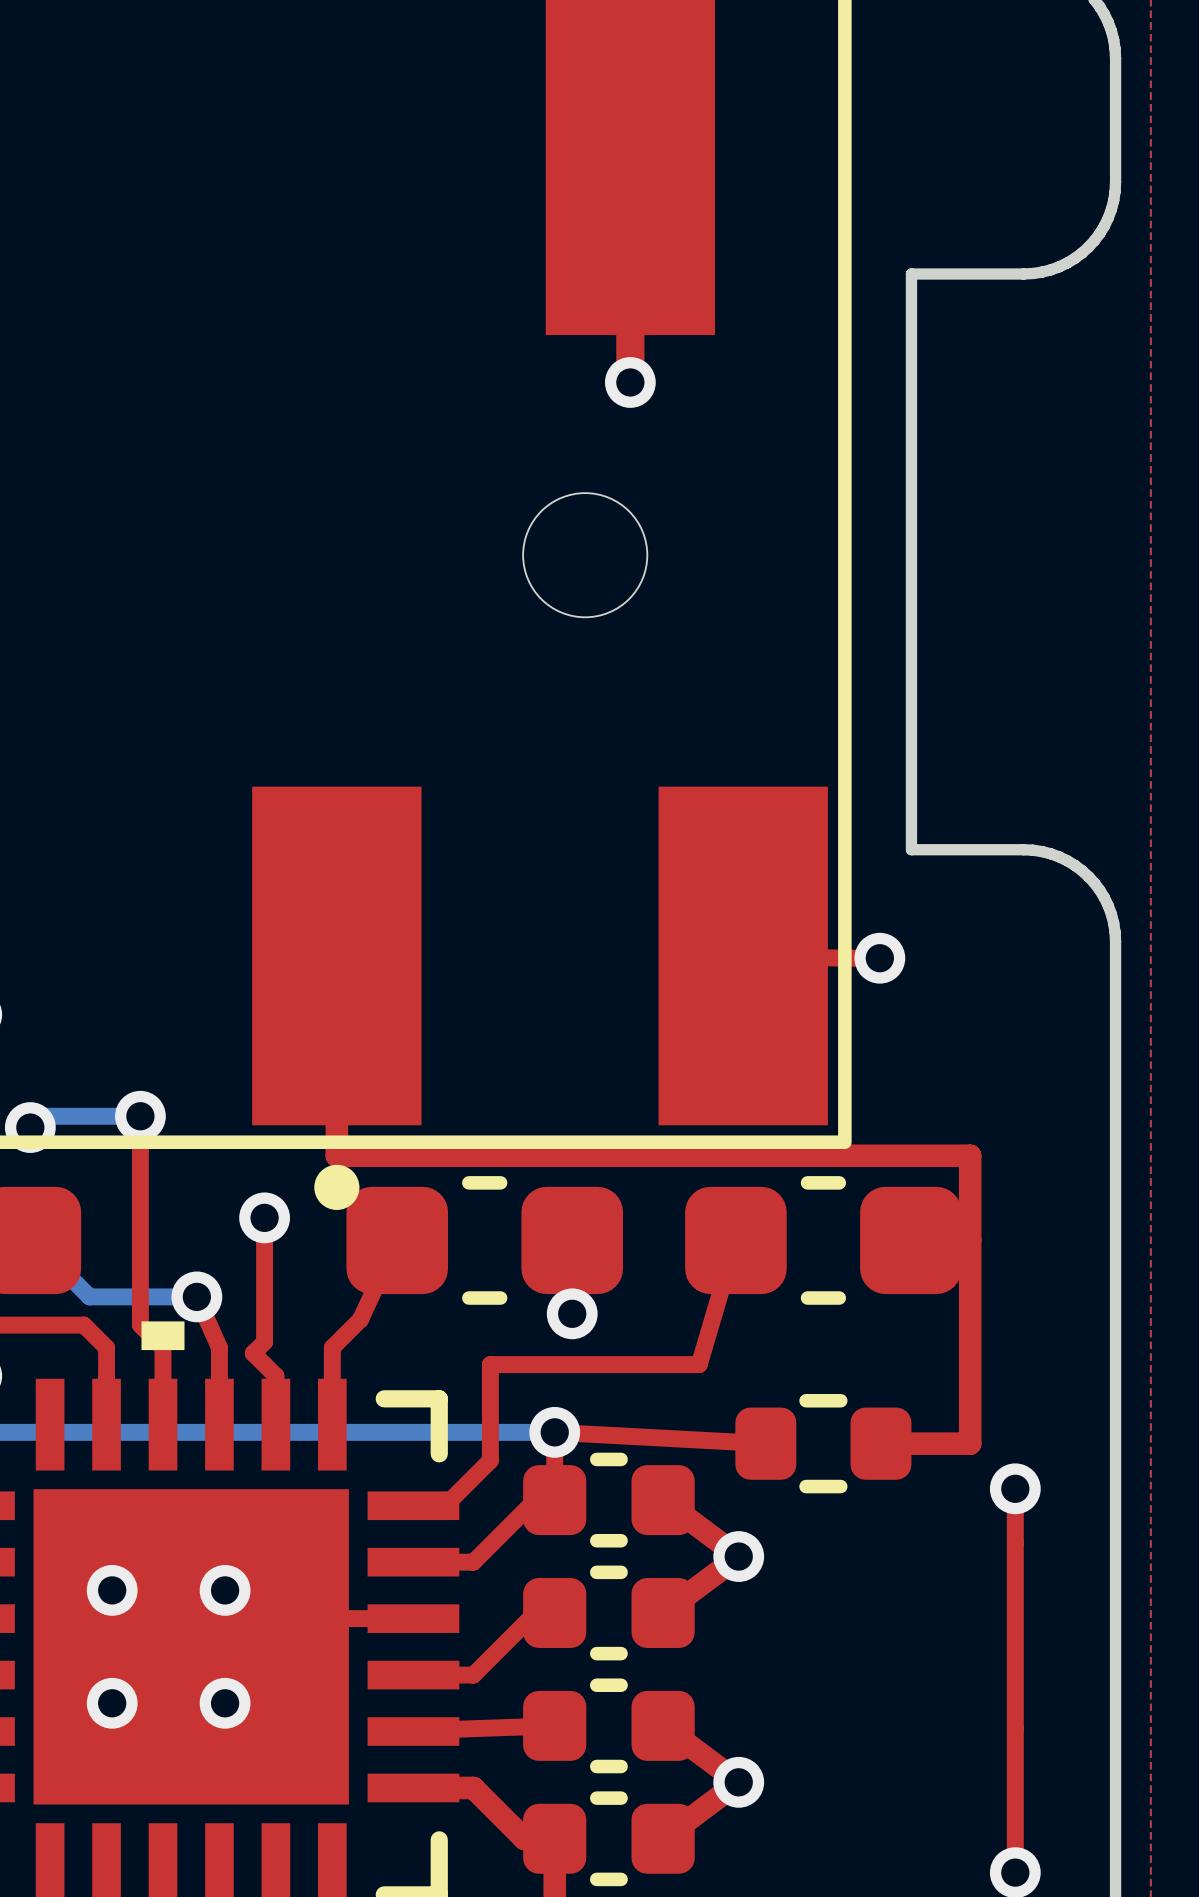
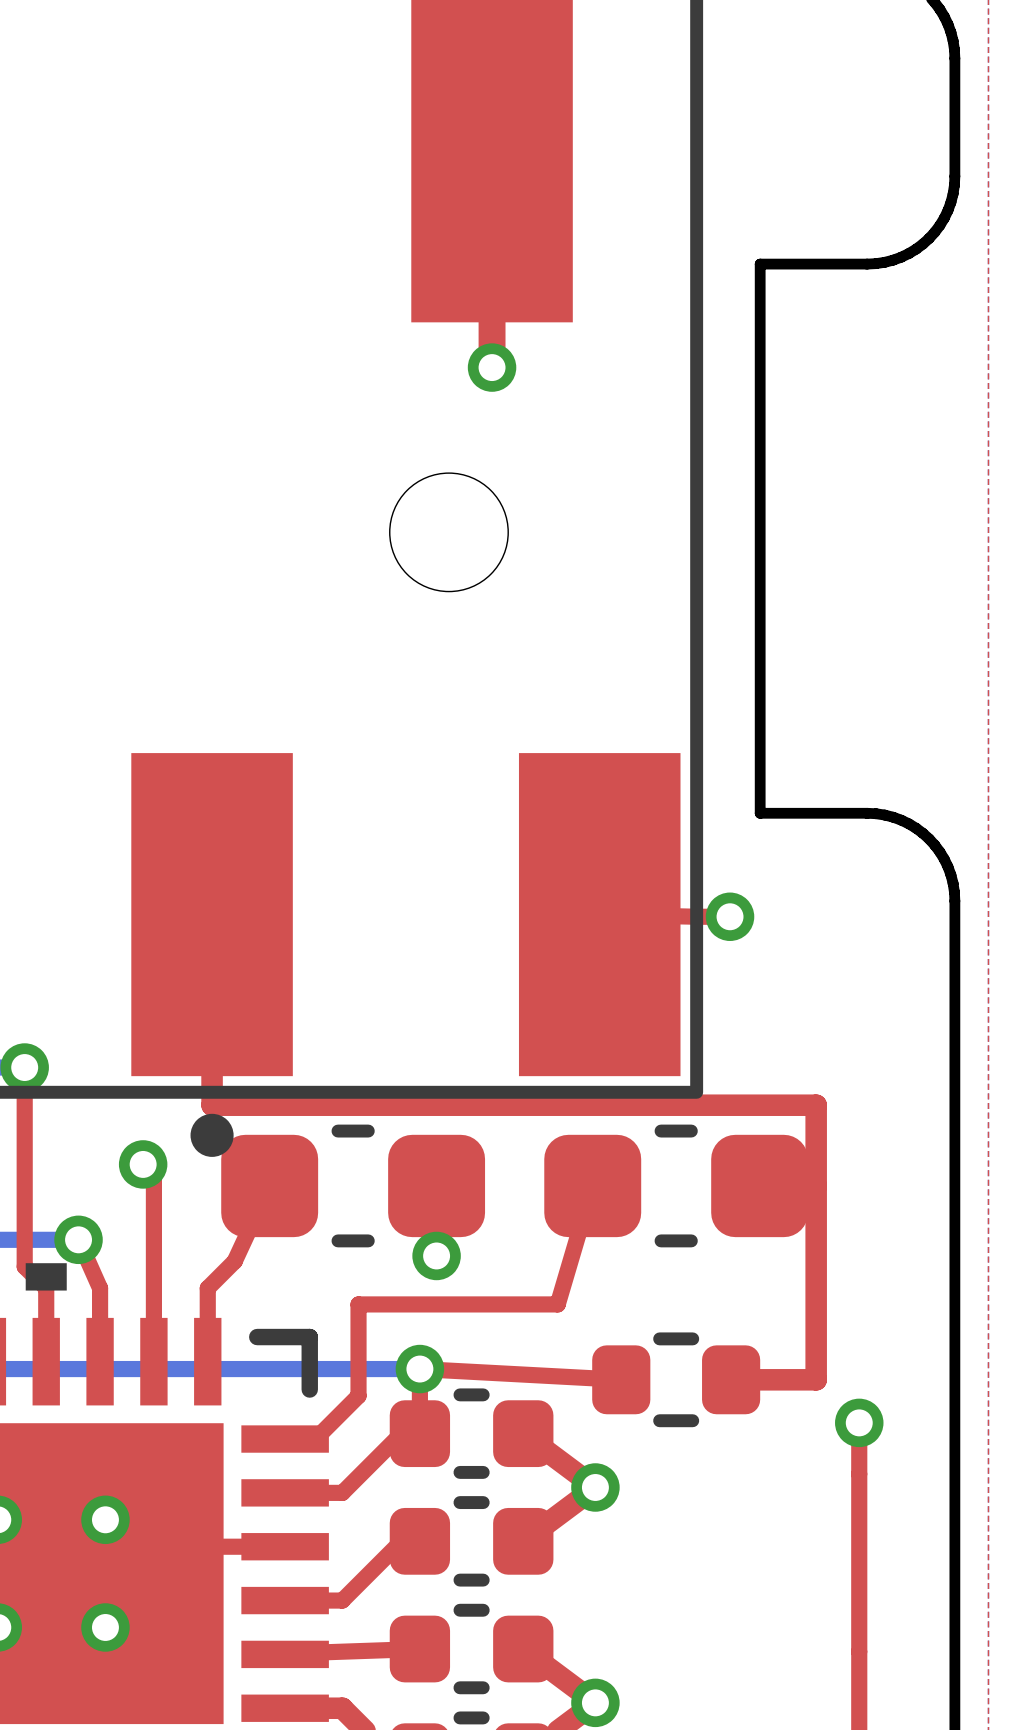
top track: (264, 1217) (264, 1342) (253, 1353) (275, 1375) -> (143, 1164) (153, 1175) (153, 1315)

